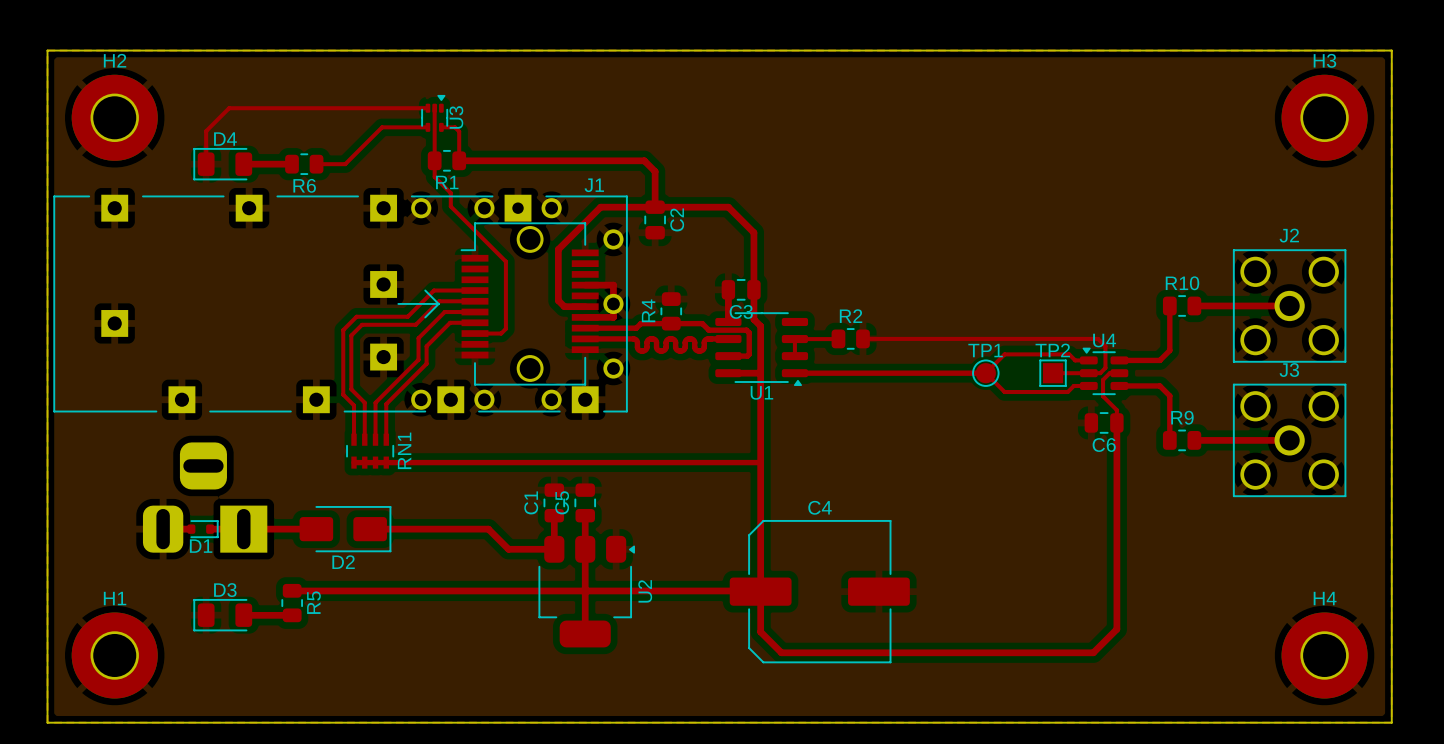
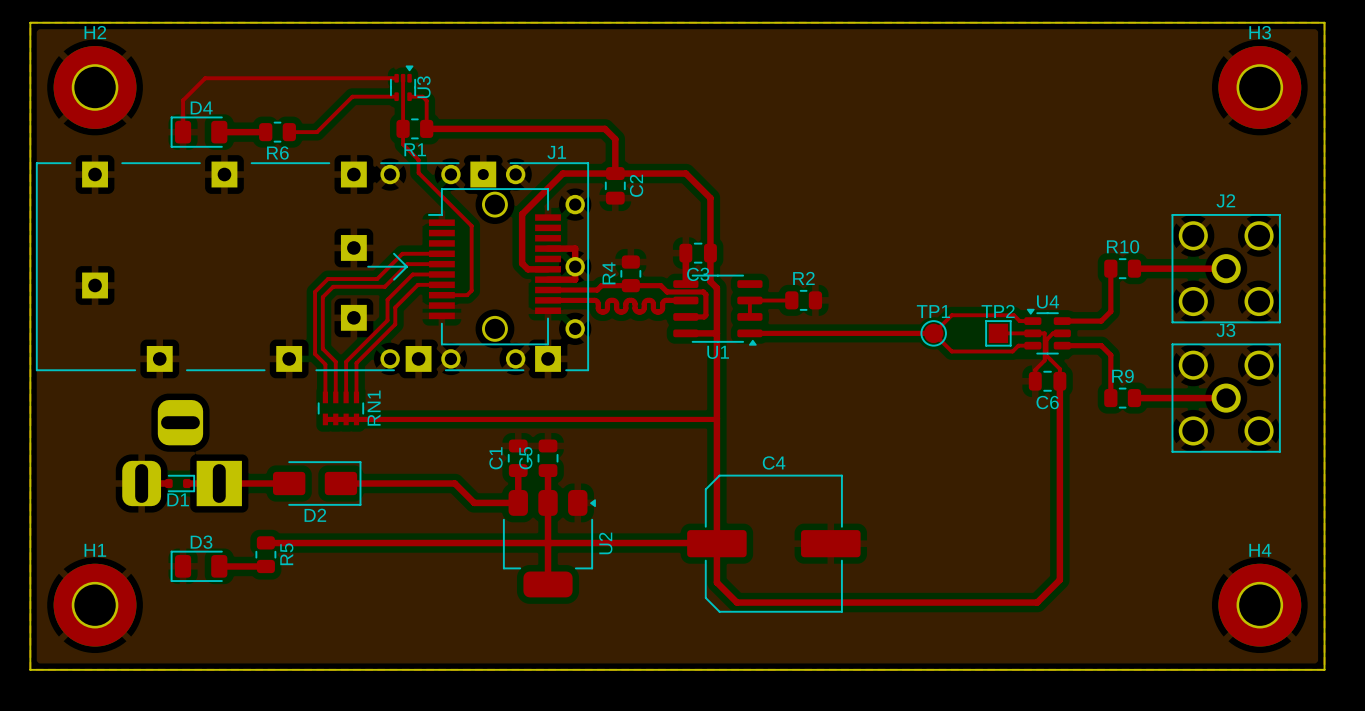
top track: (862, 338) (1098, 338) (1105, 346) (1105, 367) (1100, 373) -> (1035, 381) (1035, 369) (1044, 360) (1043, 333)

